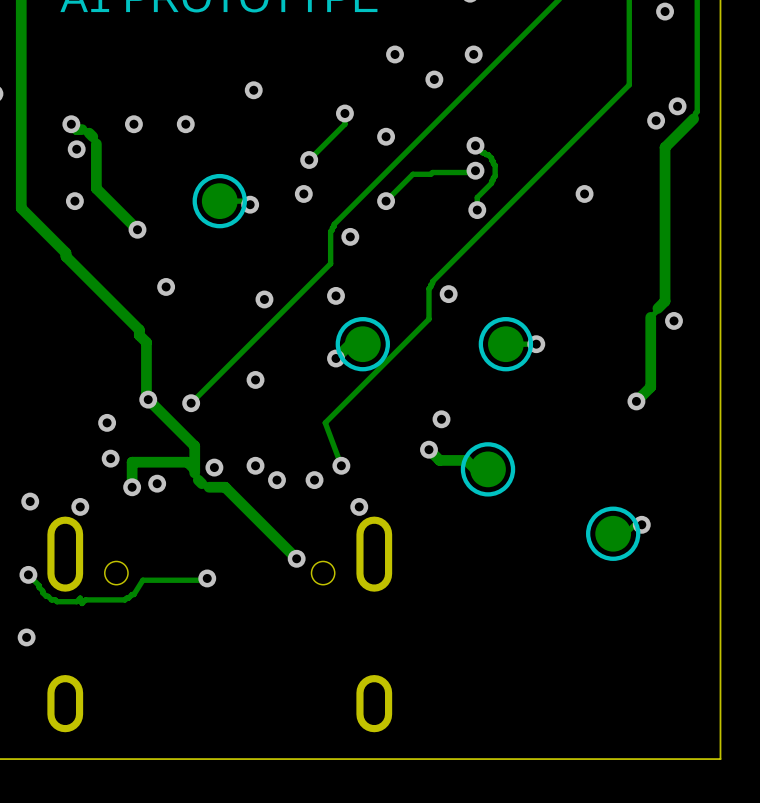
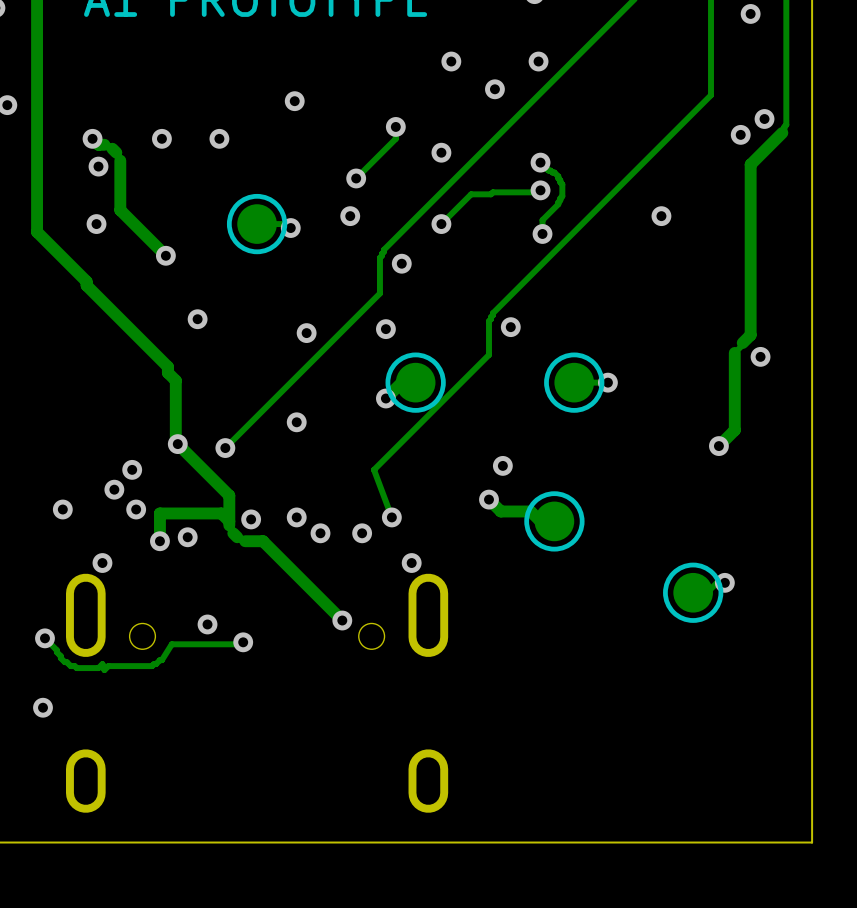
via: none -> (114, 489)
via: none -> (62, 509)
via: (30, 501) -> none
via: none -> (207, 624)

